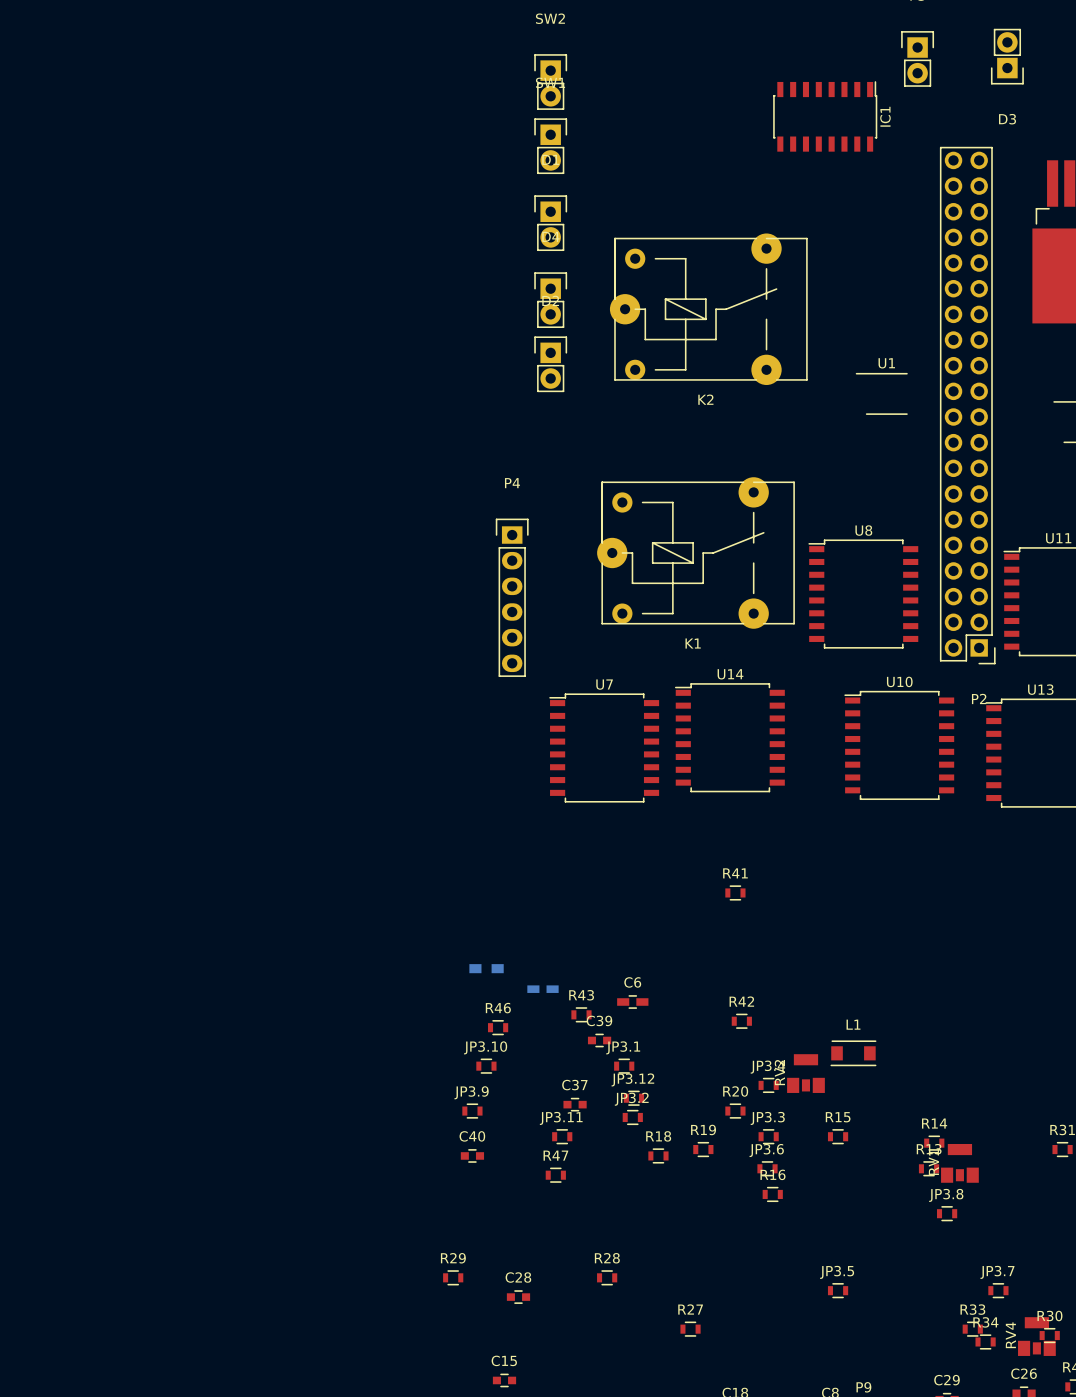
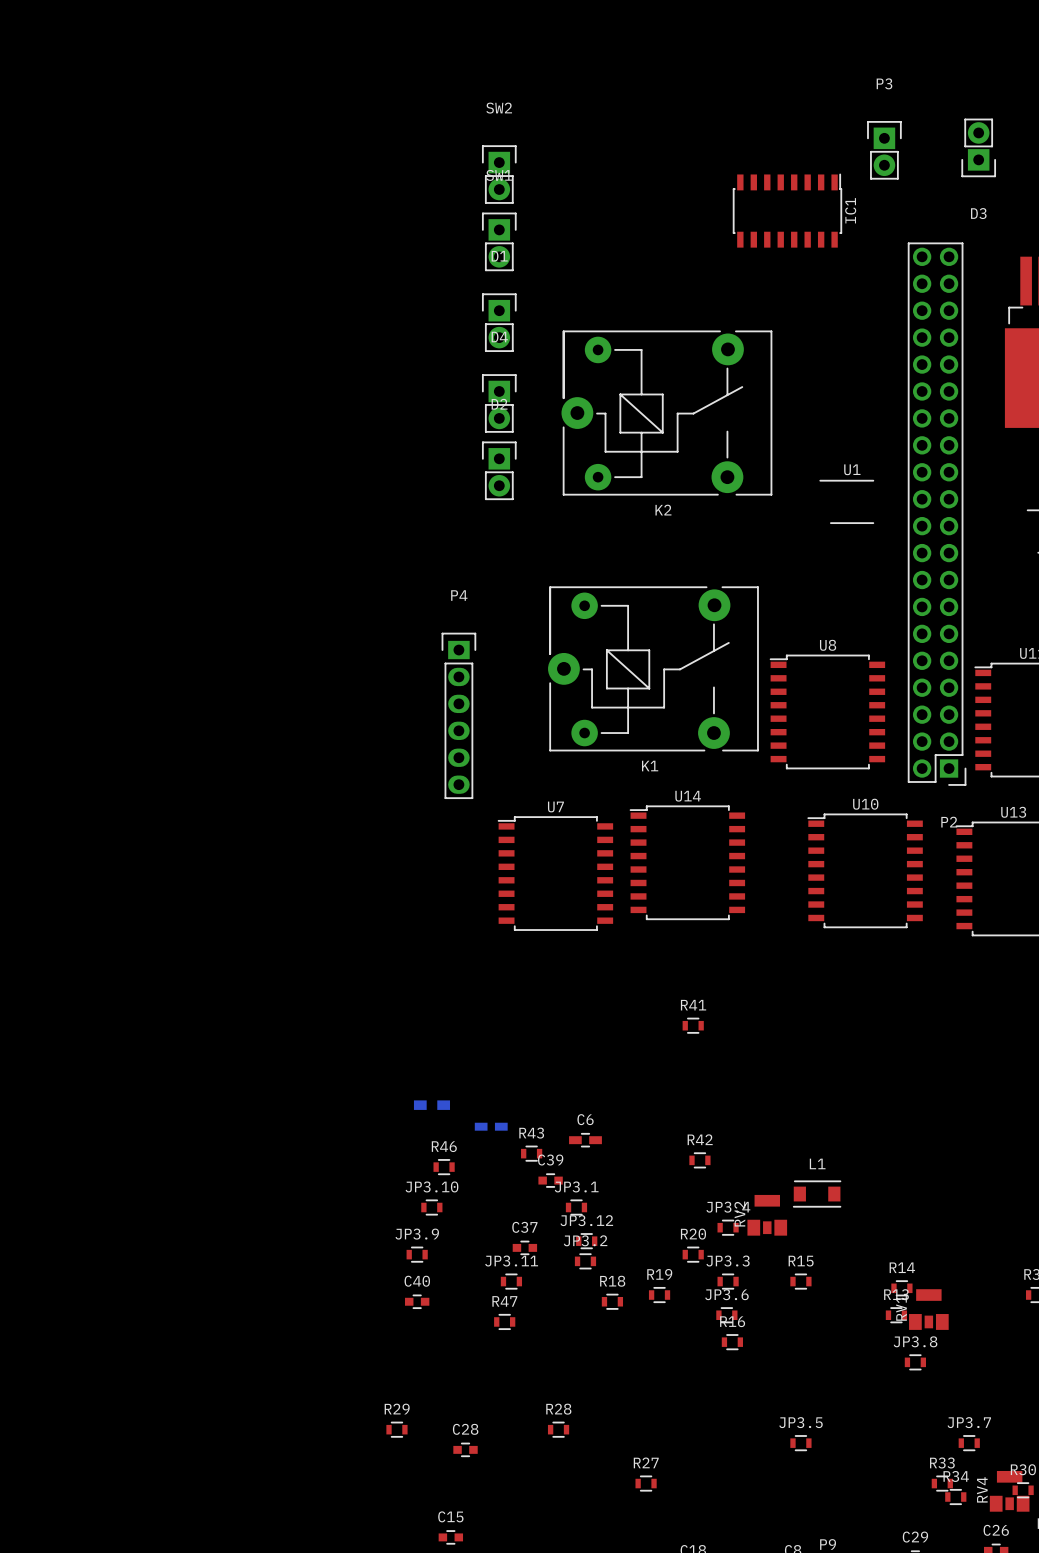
K2 footprint: [609, 233, 807, 386] -> [561, 330, 773, 496]
K1 footprint: [597, 477, 795, 629] -> [548, 586, 759, 752]

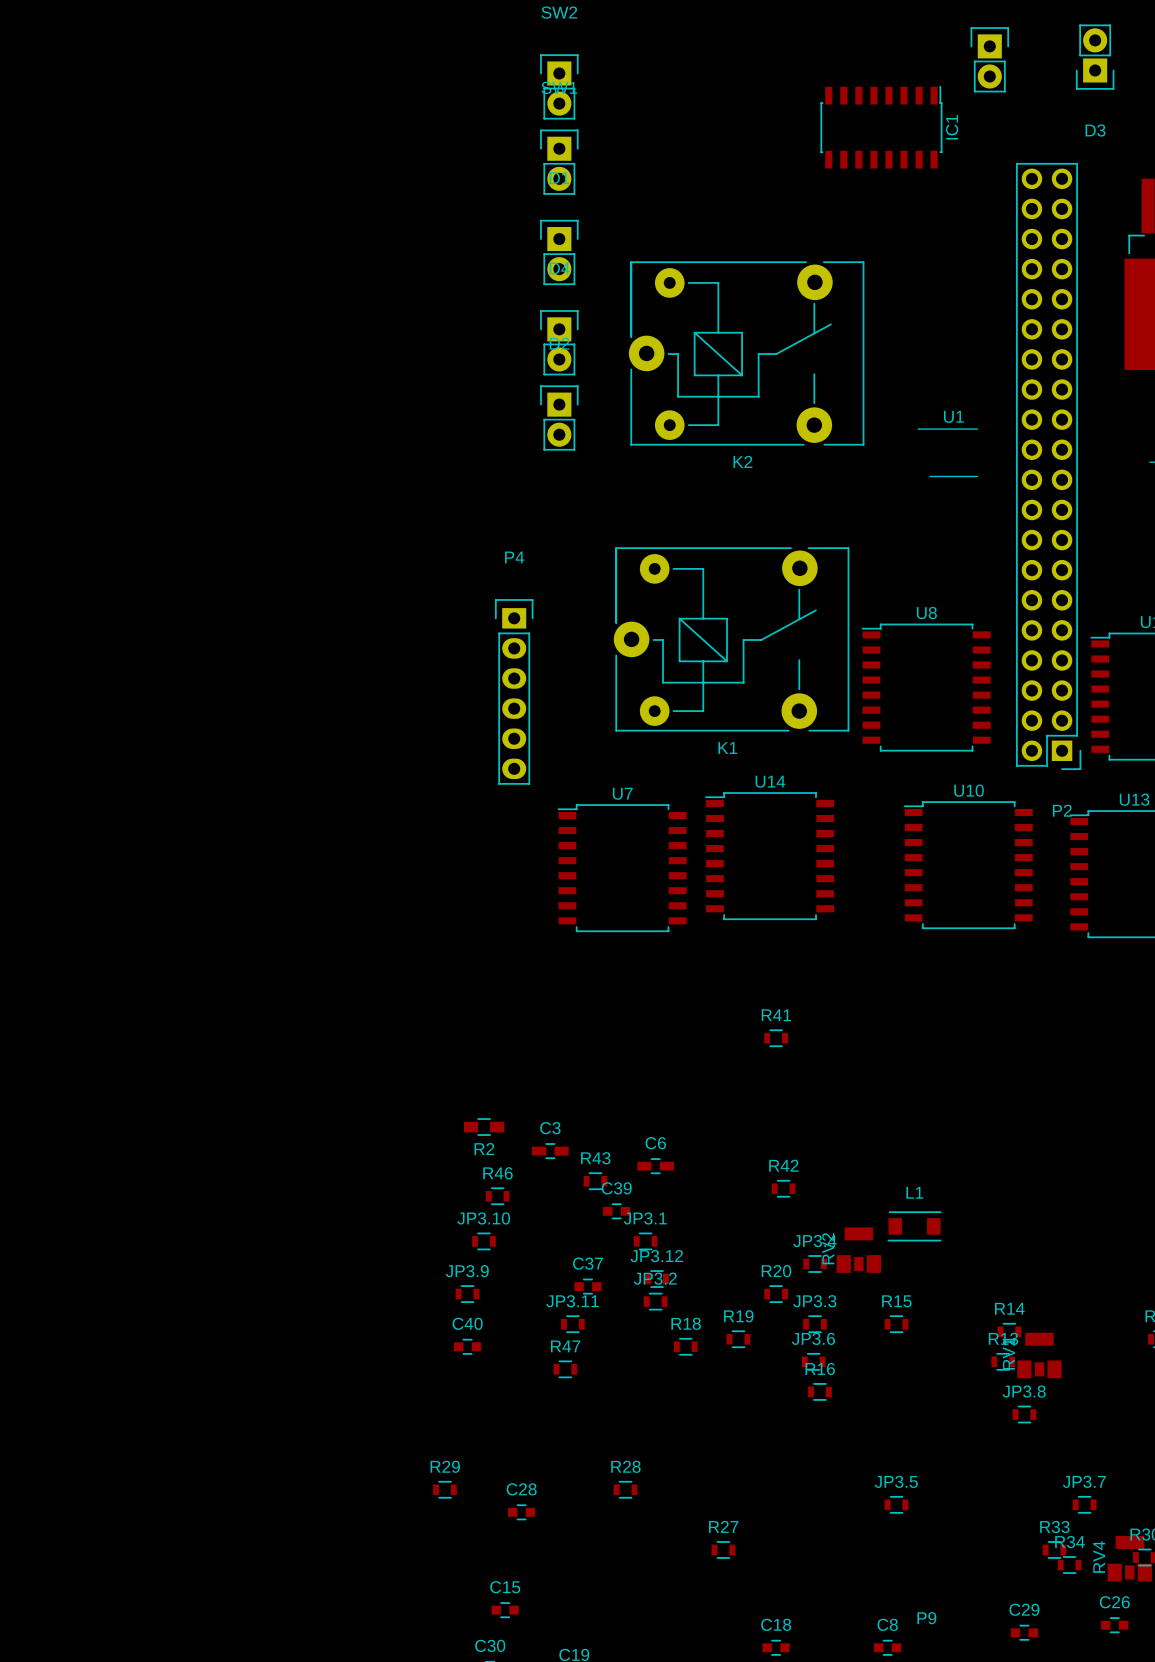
R2 side: bottom (431, 1105) -> top (484, 1127)
C3 side: bottom (491, 1126) -> top (550, 1151)

